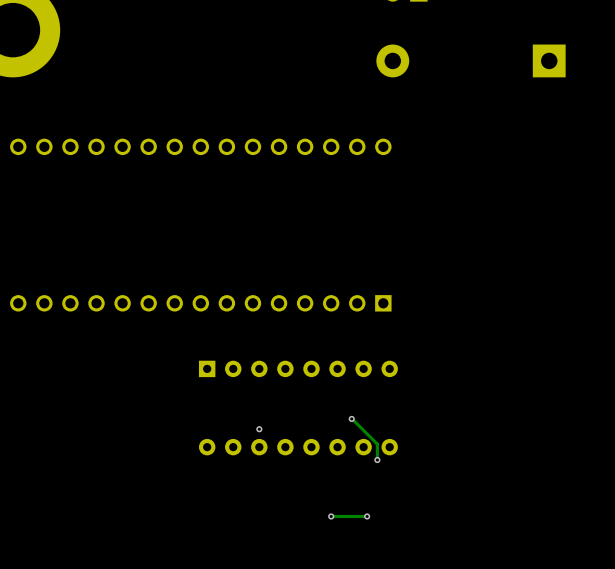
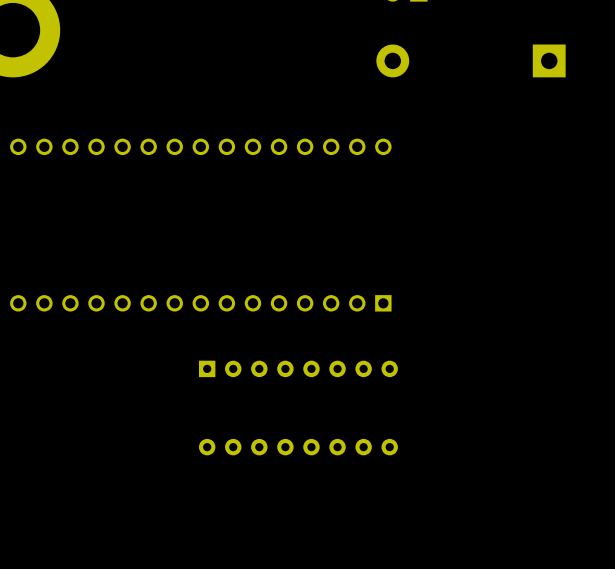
track: (351, 418) (377, 444) (377, 460) -> none
via: (351, 418) -> none
via: (259, 429) -> none
via: (377, 460) -> none
via: (331, 516) -> none
track: (367, 516) (331, 516) -> none
via: (367, 516) -> none

